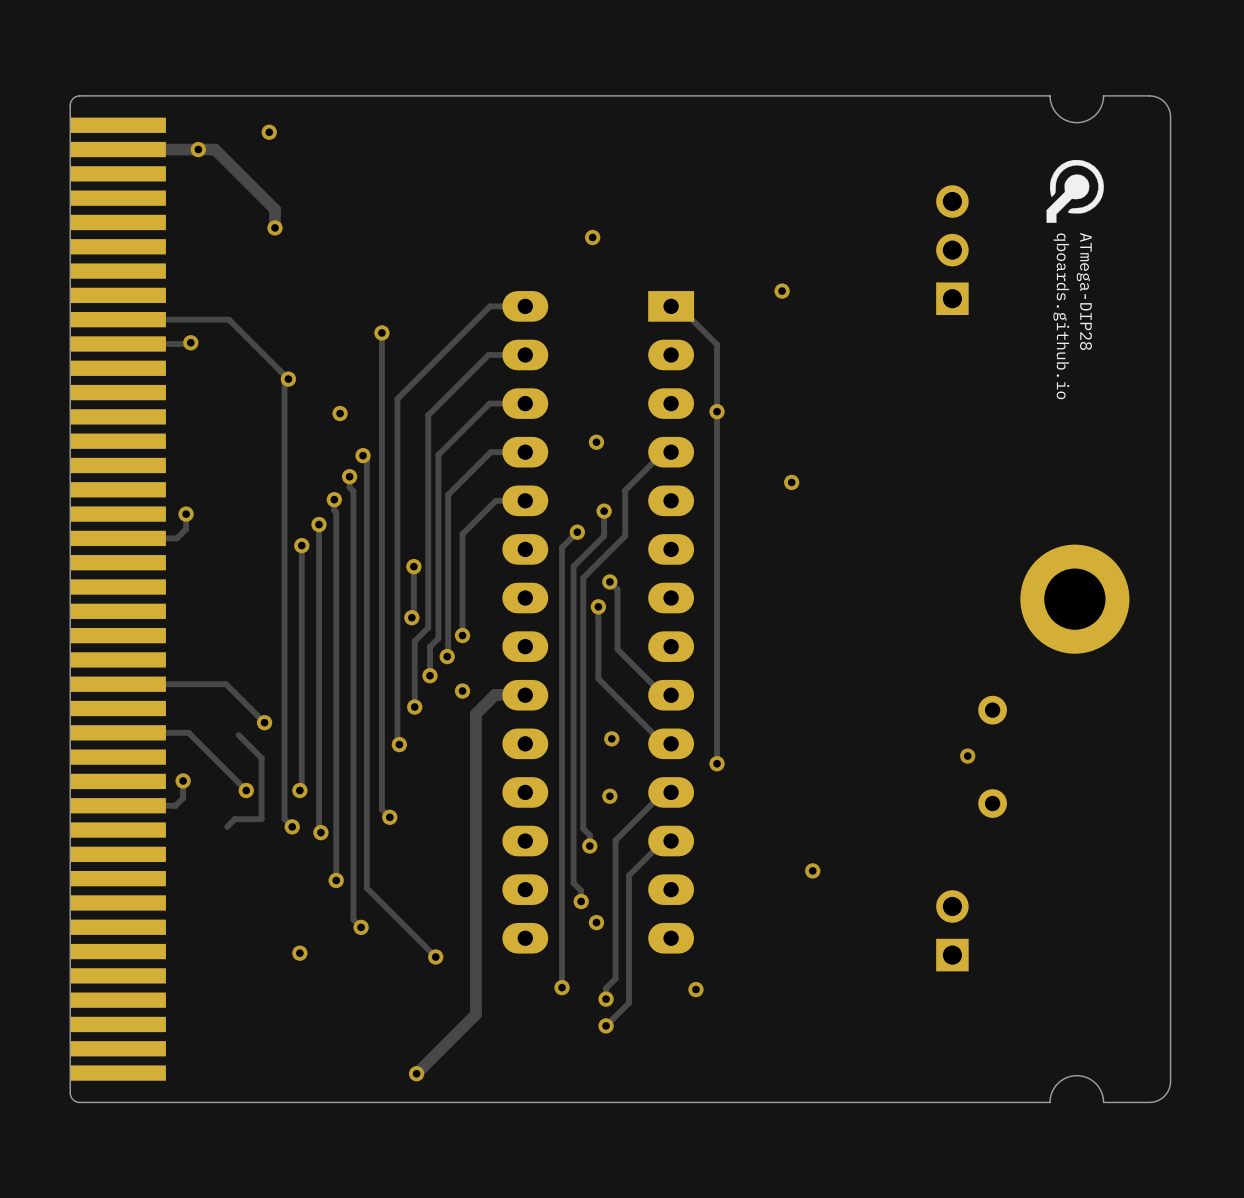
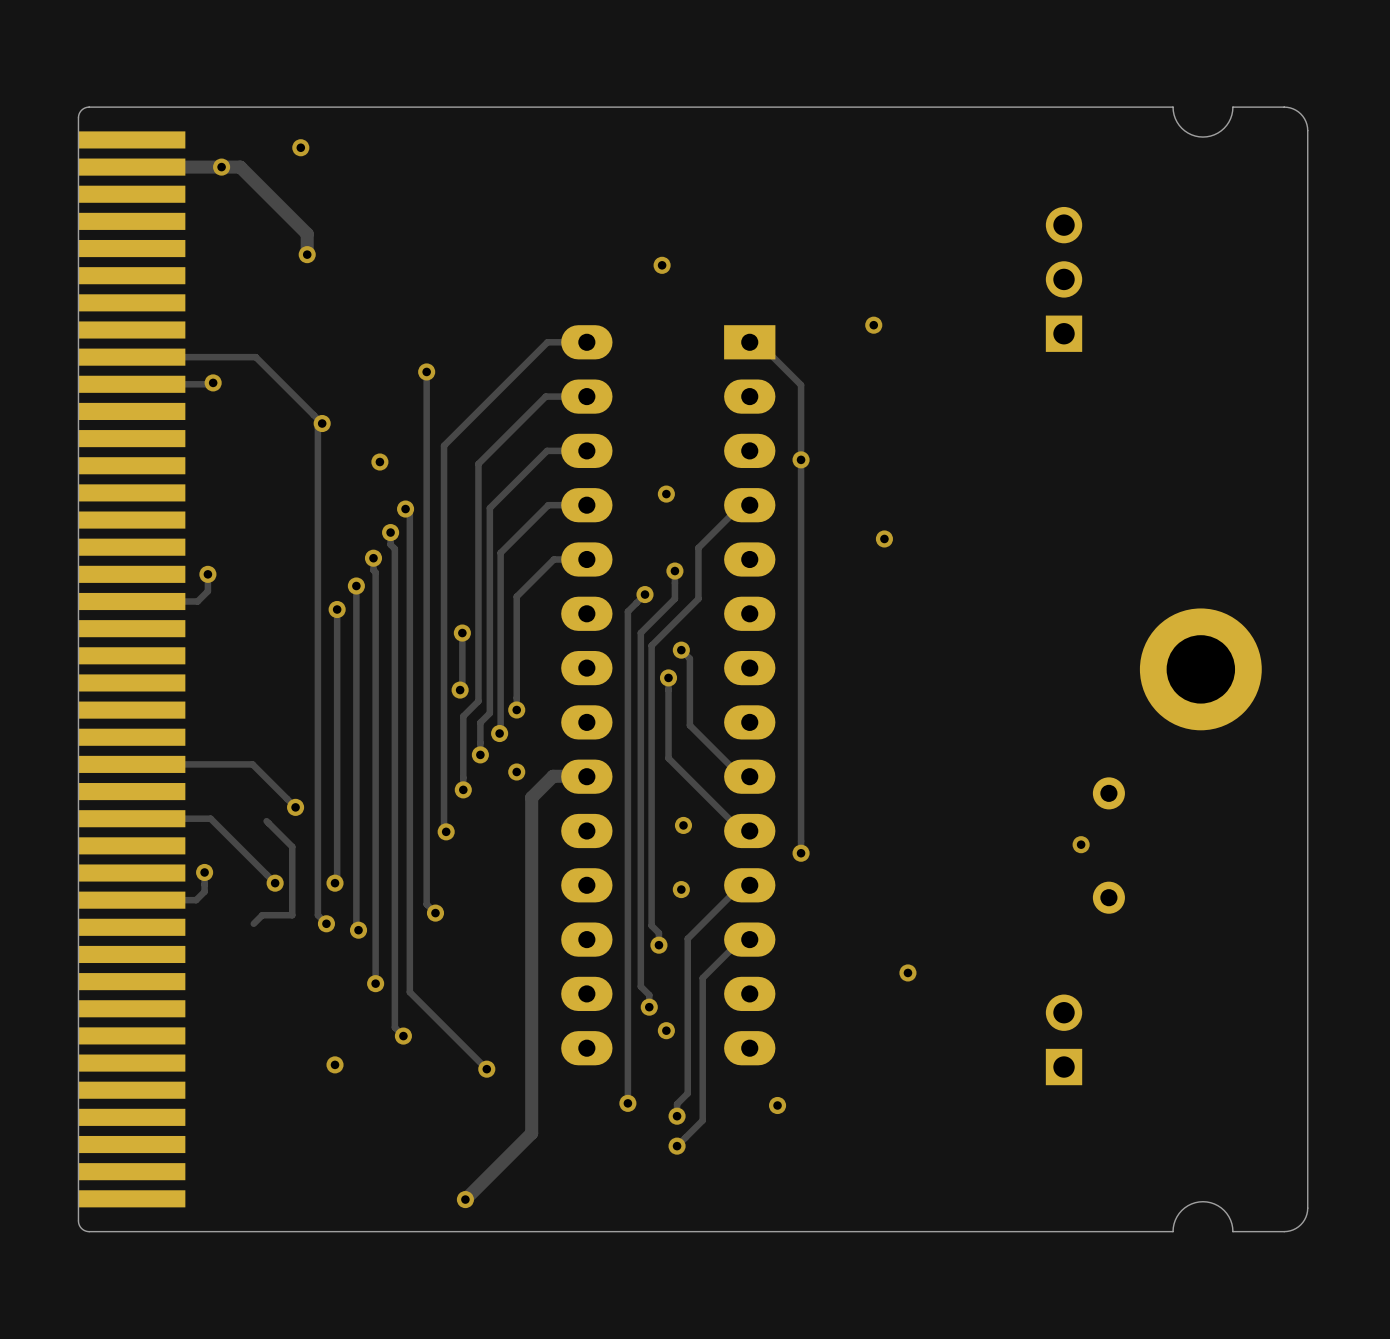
ATmega-DIP28: (1075, 191) -> none

